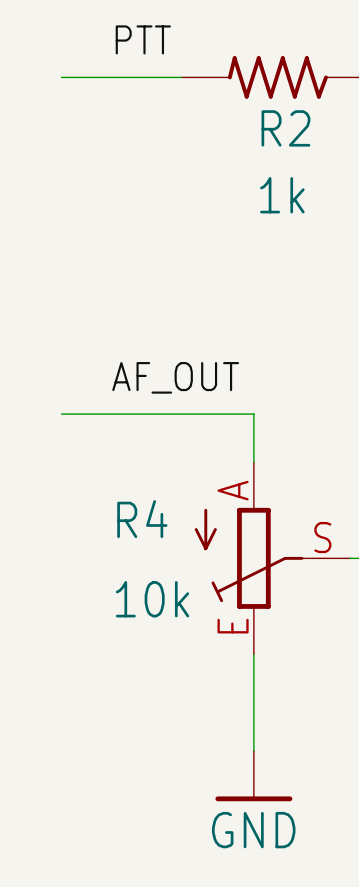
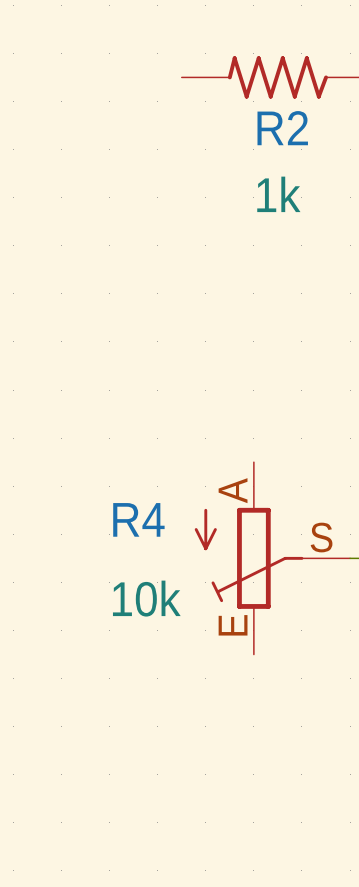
label: PTT (143, 39) -> none
wire: (61, 77) (181, 77) -> none
label: AF_OUT (175, 377) -> none
wire: (61, 414) (253, 414) (253, 462) -> none
wire: (253, 654) (253, 750) -> none
power symbol: GND (253, 775) -> none

